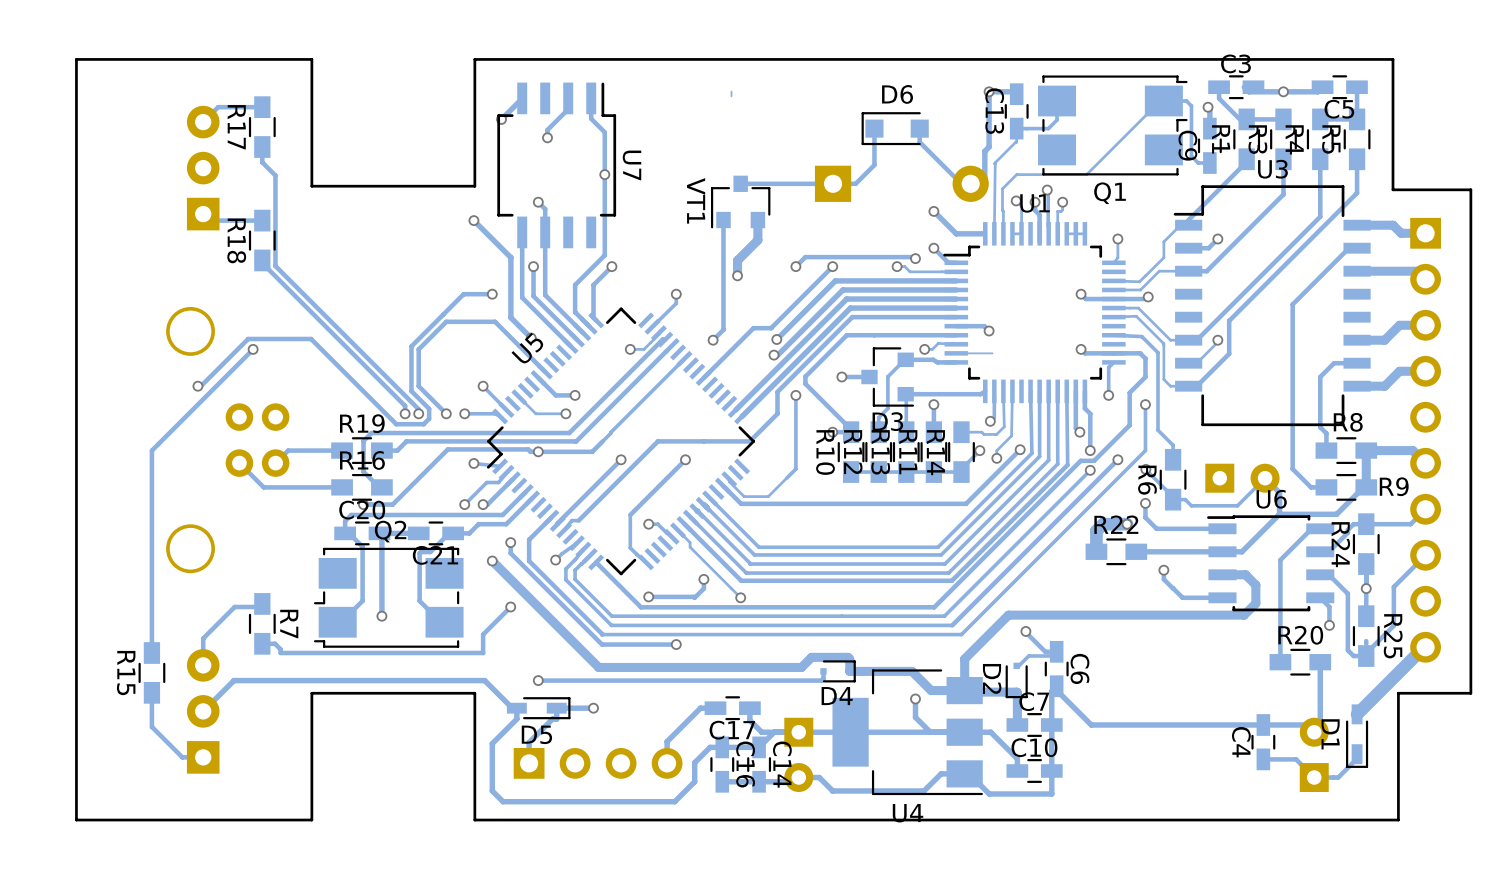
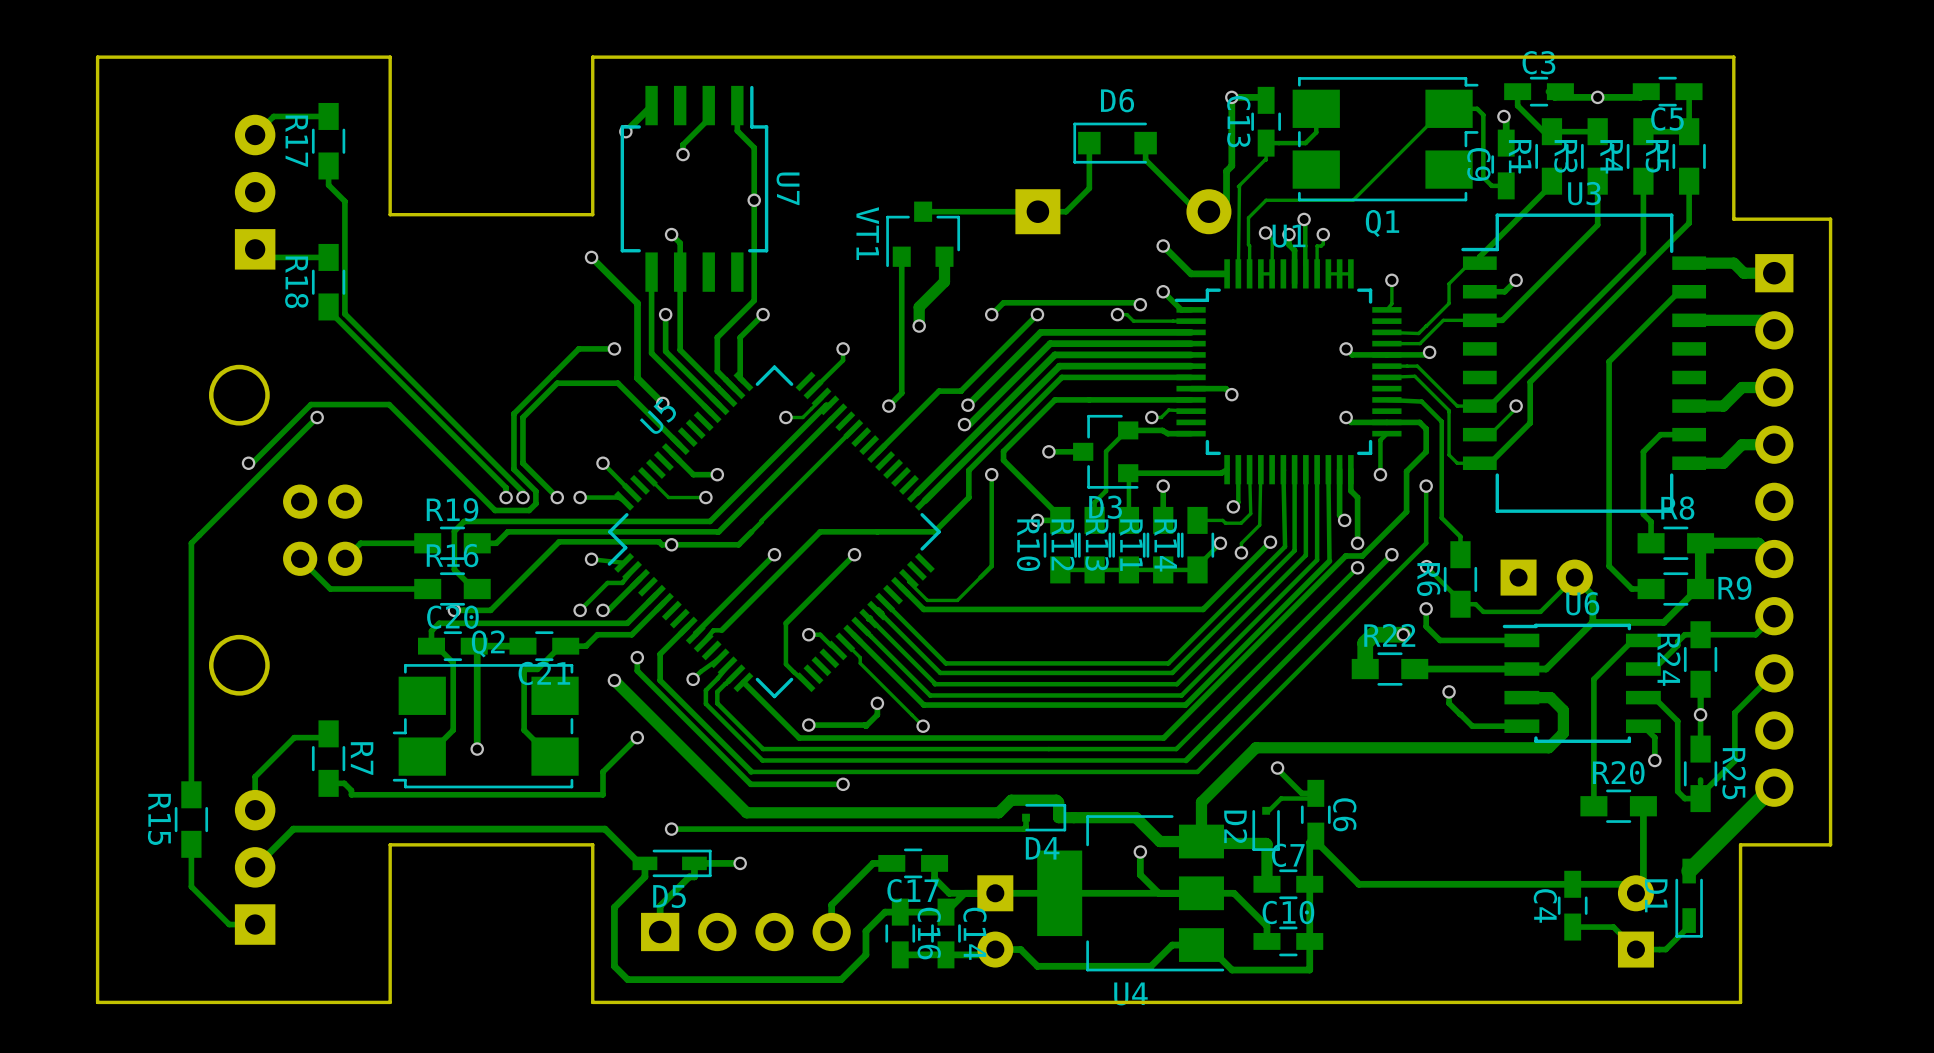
track: (731, 91) (731, 96) -> none
track: (992, 353) (956, 353) -> none

